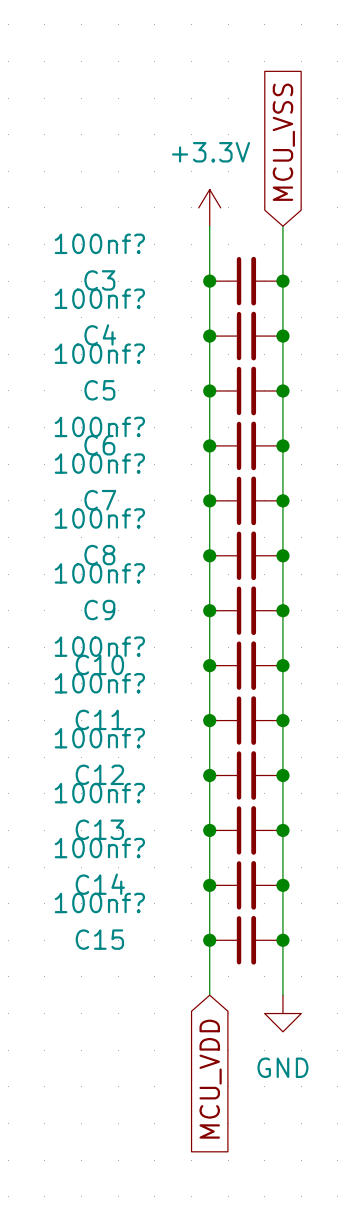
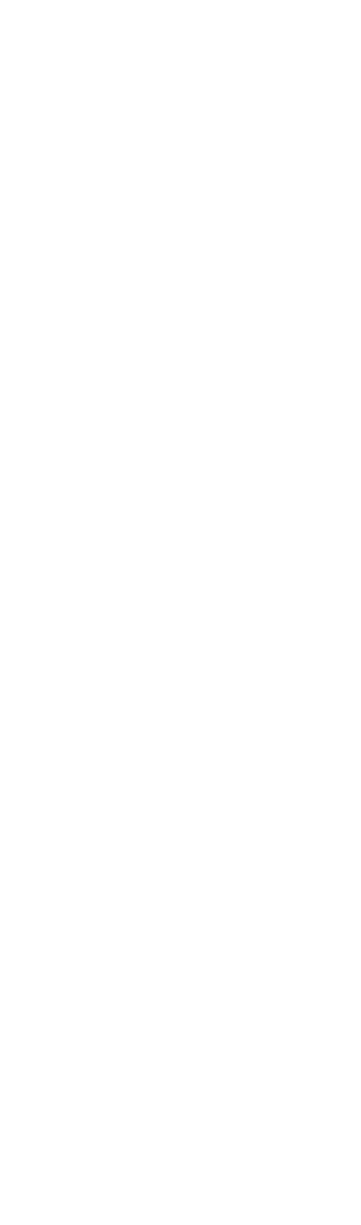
global label: MCU_VSS (283, 142) -> none
power symbol: +3.3V (209, 207) -> none
wire: (209, 226) (209, 995) -> none
wire: (282, 226) (282, 995) -> none
junction: (209, 281) -> none
C3: 100nf? (246, 281) -> none
junction: (282, 281) -> none
junction: (209, 336) -> none
C4: 100nf? (246, 336) -> none
junction: (282, 336) -> none
junction: (209, 390) -> none
C5: 100nf? (246, 390) -> none
junction: (282, 390) -> none
junction: (209, 445) -> none
C6: 100nf? (246, 445) -> none
junction: (282, 445) -> none
junction: (209, 500) -> none
C7: 100nf? (246, 500) -> none
junction: (282, 500) -> none
junction: (209, 555) -> none
C8: 100nf? (246, 555) -> none
junction: (282, 555) -> none
junction: (209, 610) -> none
C9: 100nf? (246, 610) -> none
junction: (282, 610) -> none
junction: (209, 665) -> none
C10: 100nf? (246, 665) -> none
junction: (282, 665) -> none
junction: (209, 720) -> none
C11: 100nf? (246, 720) -> none
junction: (282, 720) -> none
junction: (209, 775) -> none
C12: 100nf? (246, 775) -> none
junction: (282, 775) -> none
junction: (209, 830) -> none
C13: 100nf? (246, 830) -> none
junction: (282, 830) -> none
junction: (209, 885) -> none
C14: 100nf? (246, 885) -> none
junction: (282, 885) -> none
junction: (209, 940) -> none
C15: 100nf? (246, 940) -> none
junction: (282, 940) -> none
power symbol: GND (282, 1013) -> none
global label: MCU_VDD (210, 1079) -> none

